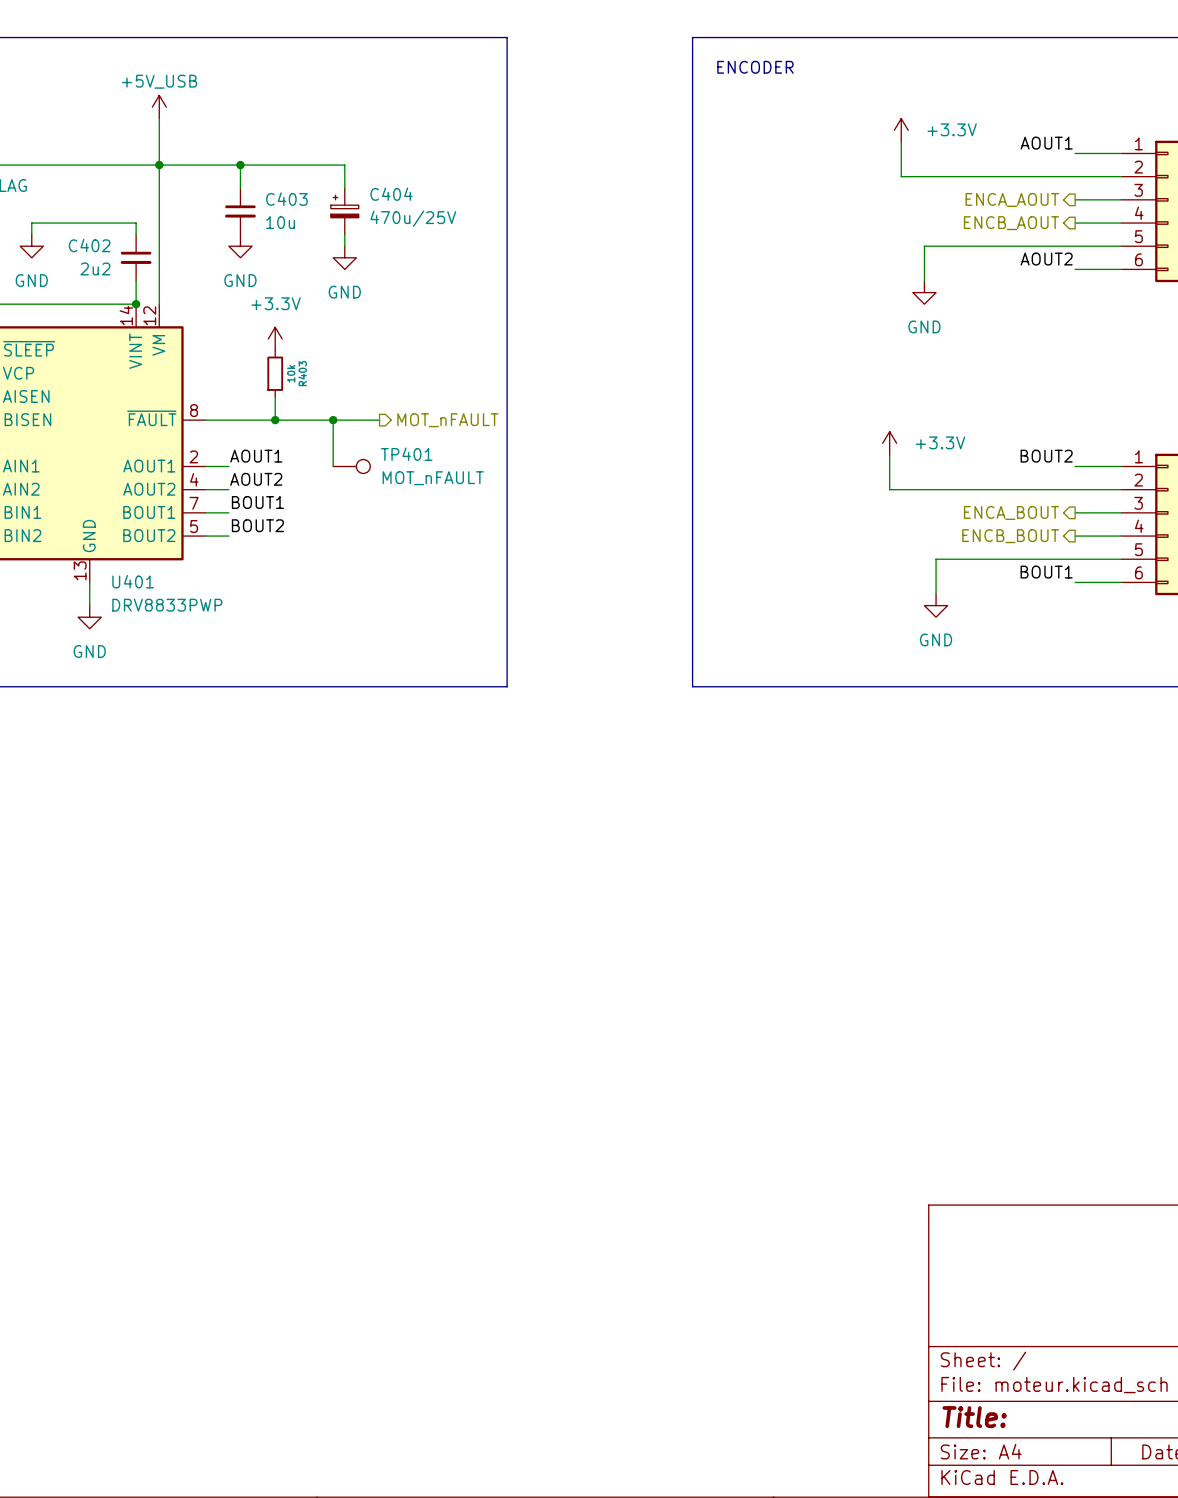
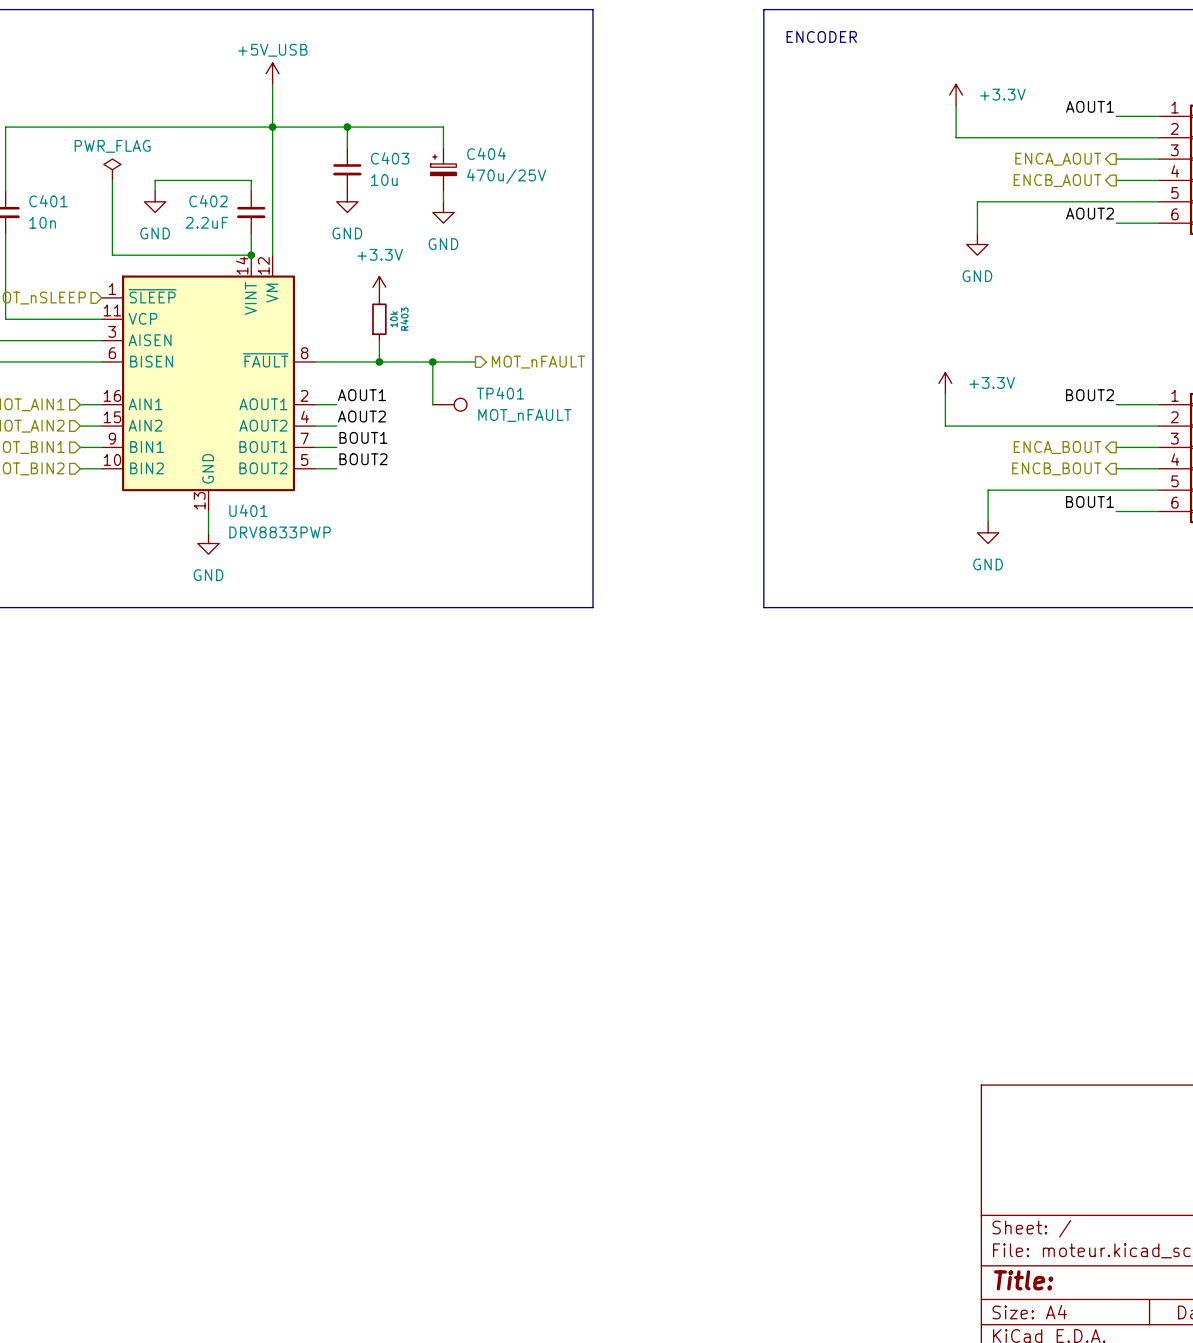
C402 value: 2u2 (95, 268) -> 2.2uF (206, 222)

